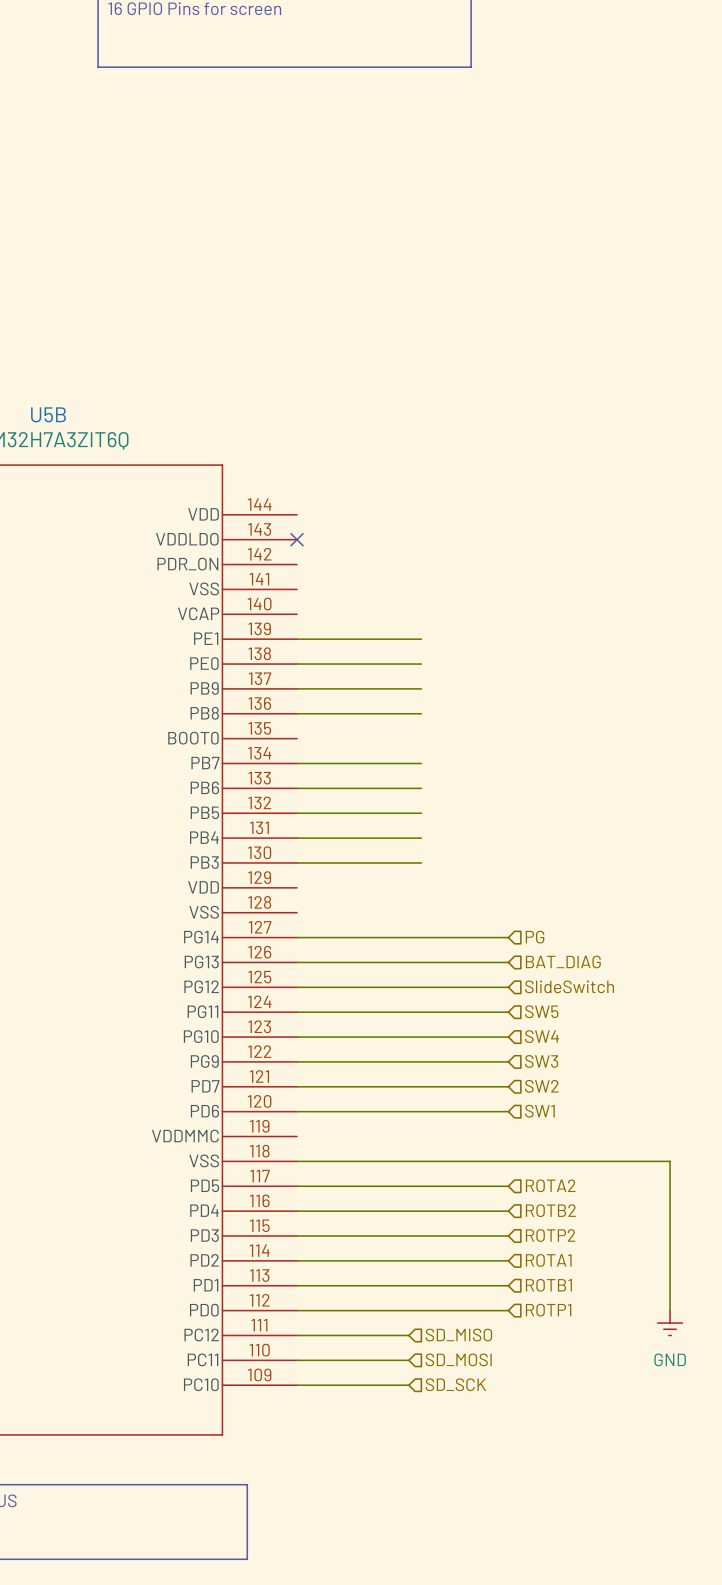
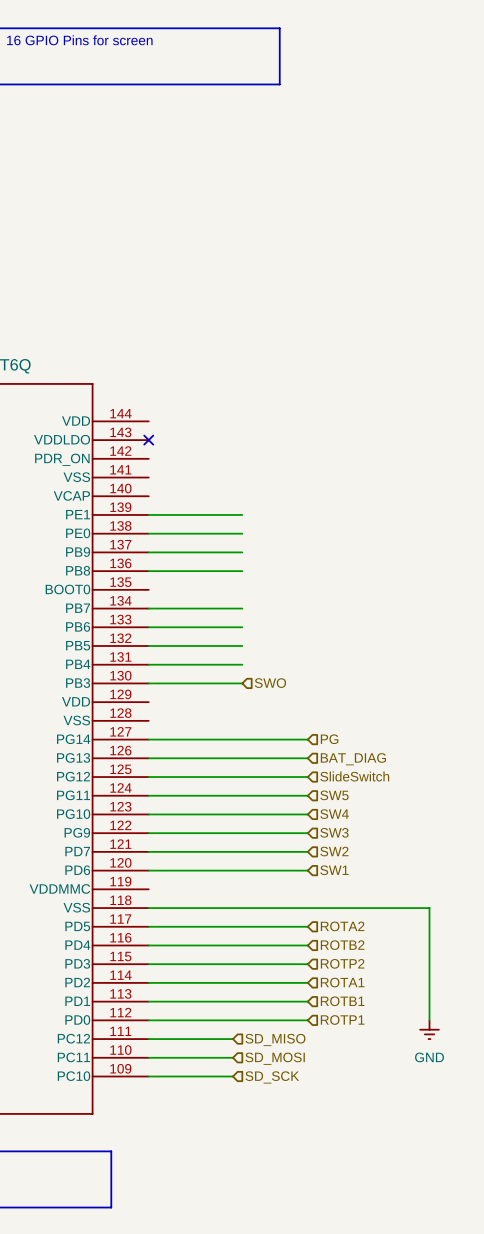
hierarchical label: none -> SWO (270, 683)

